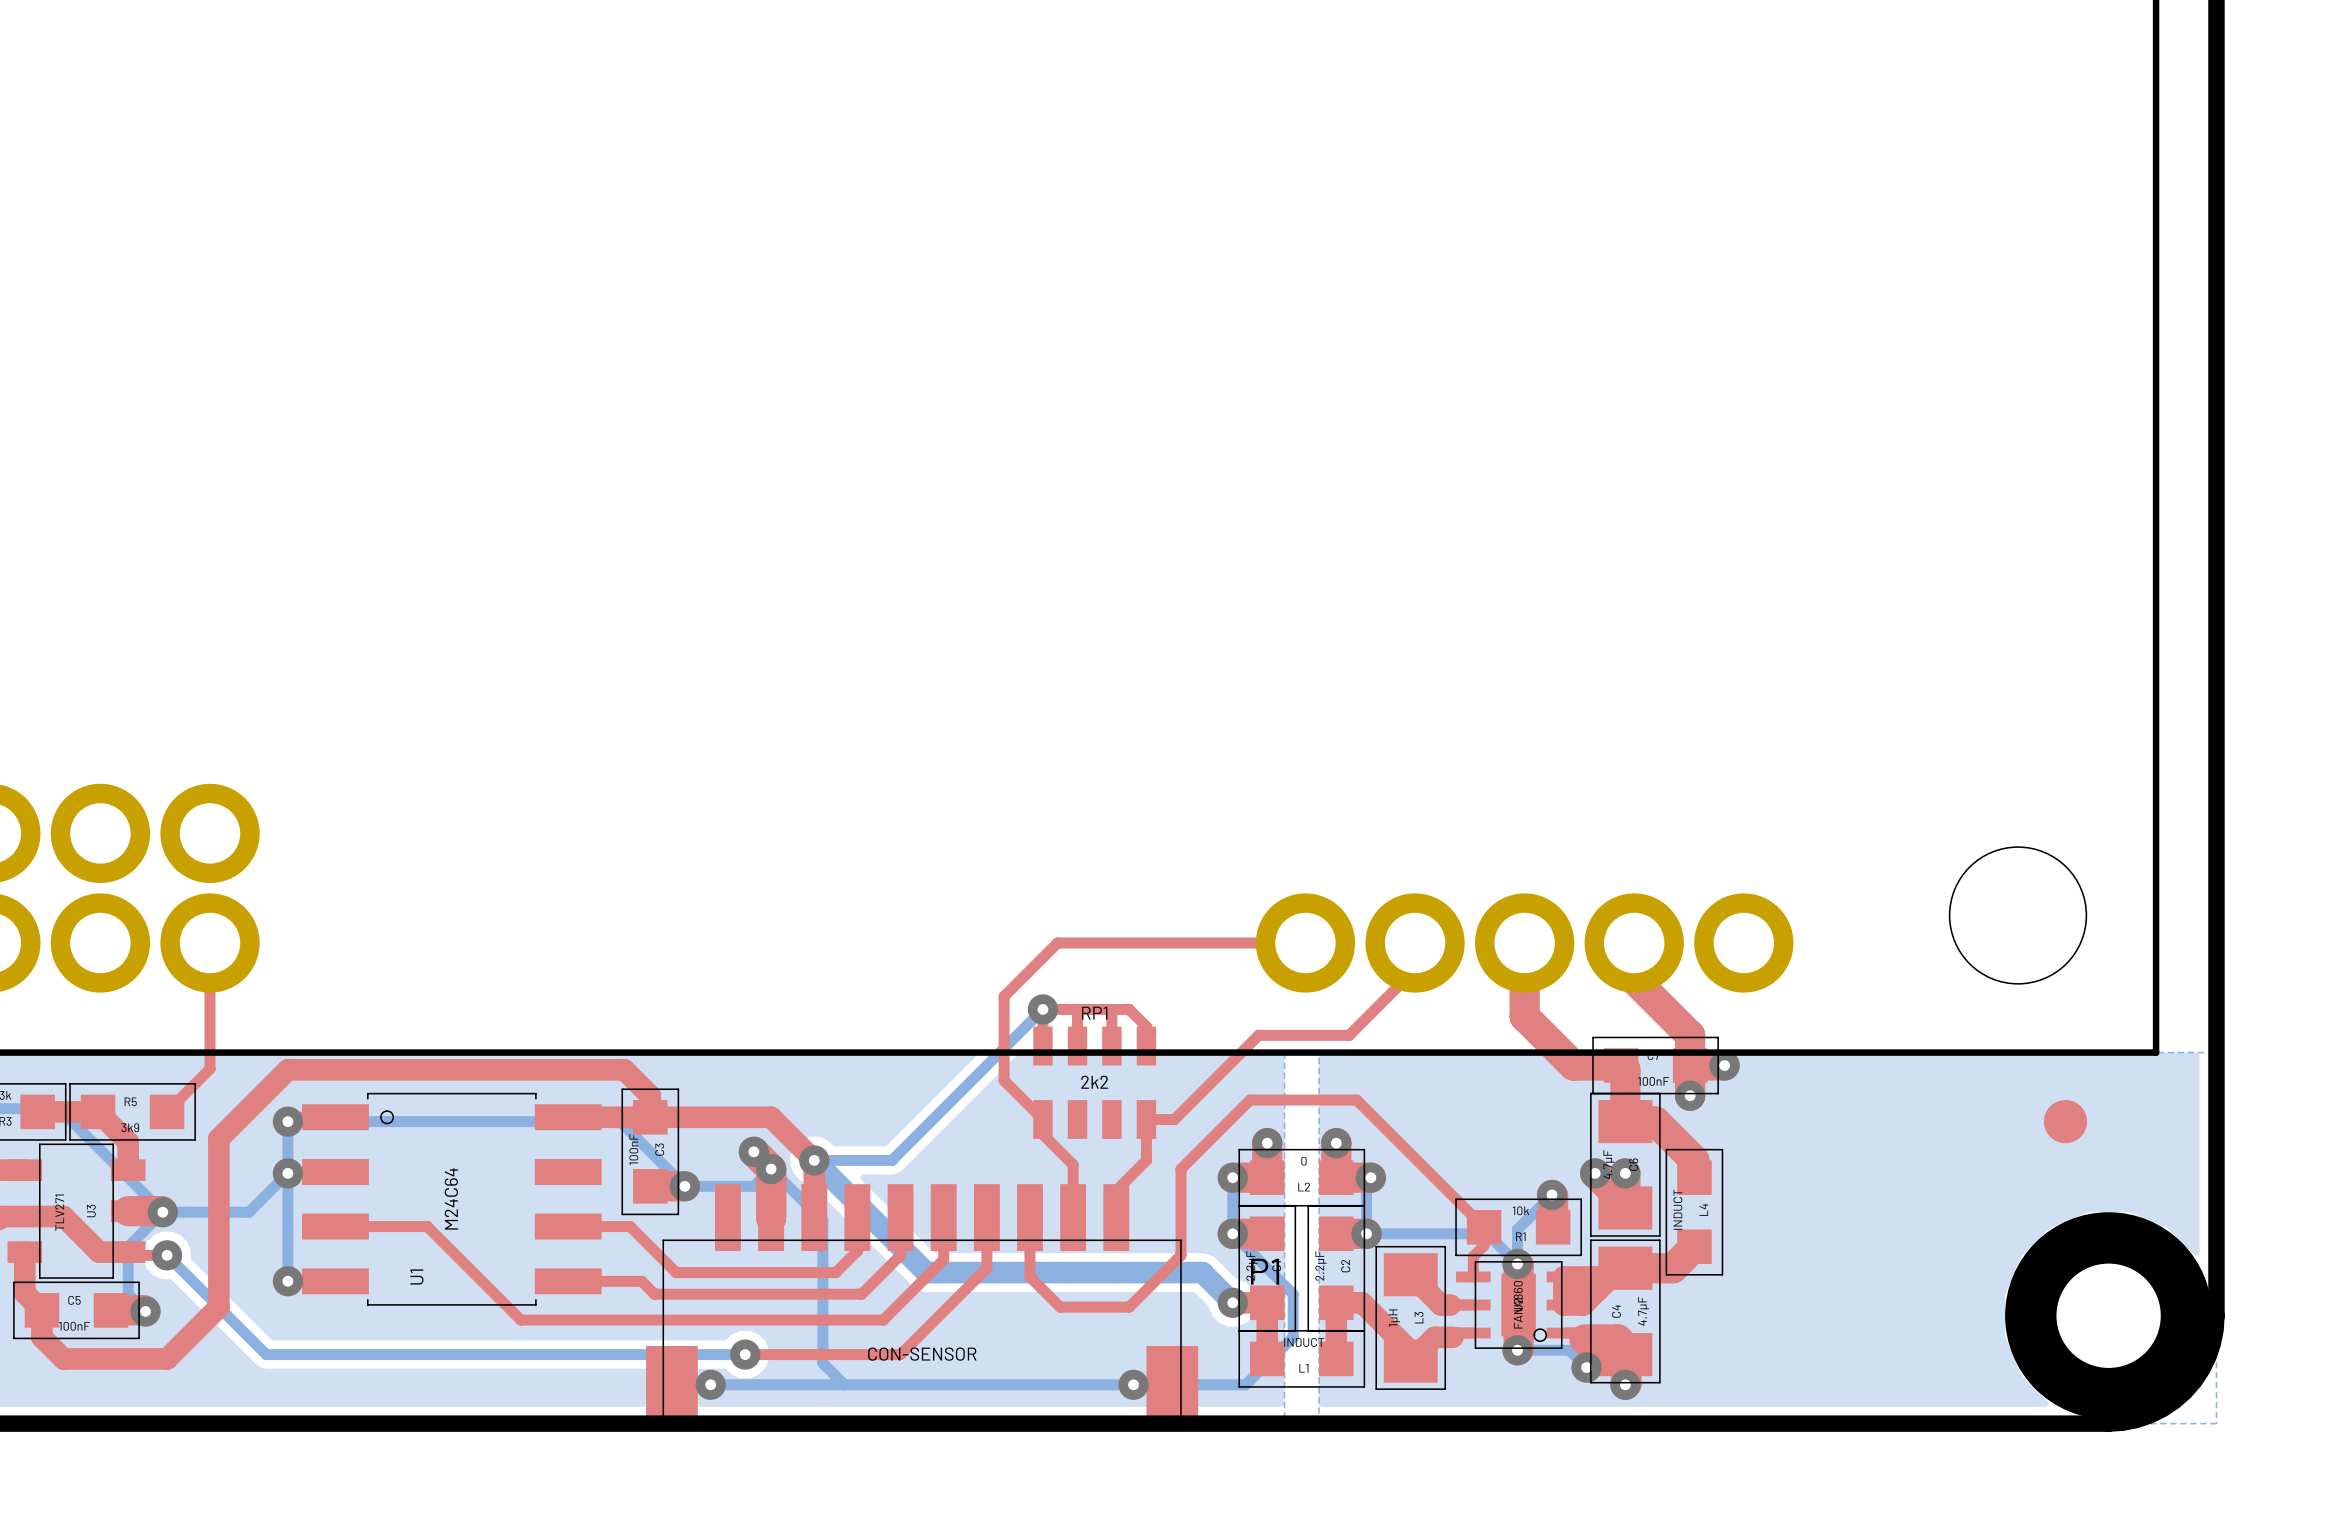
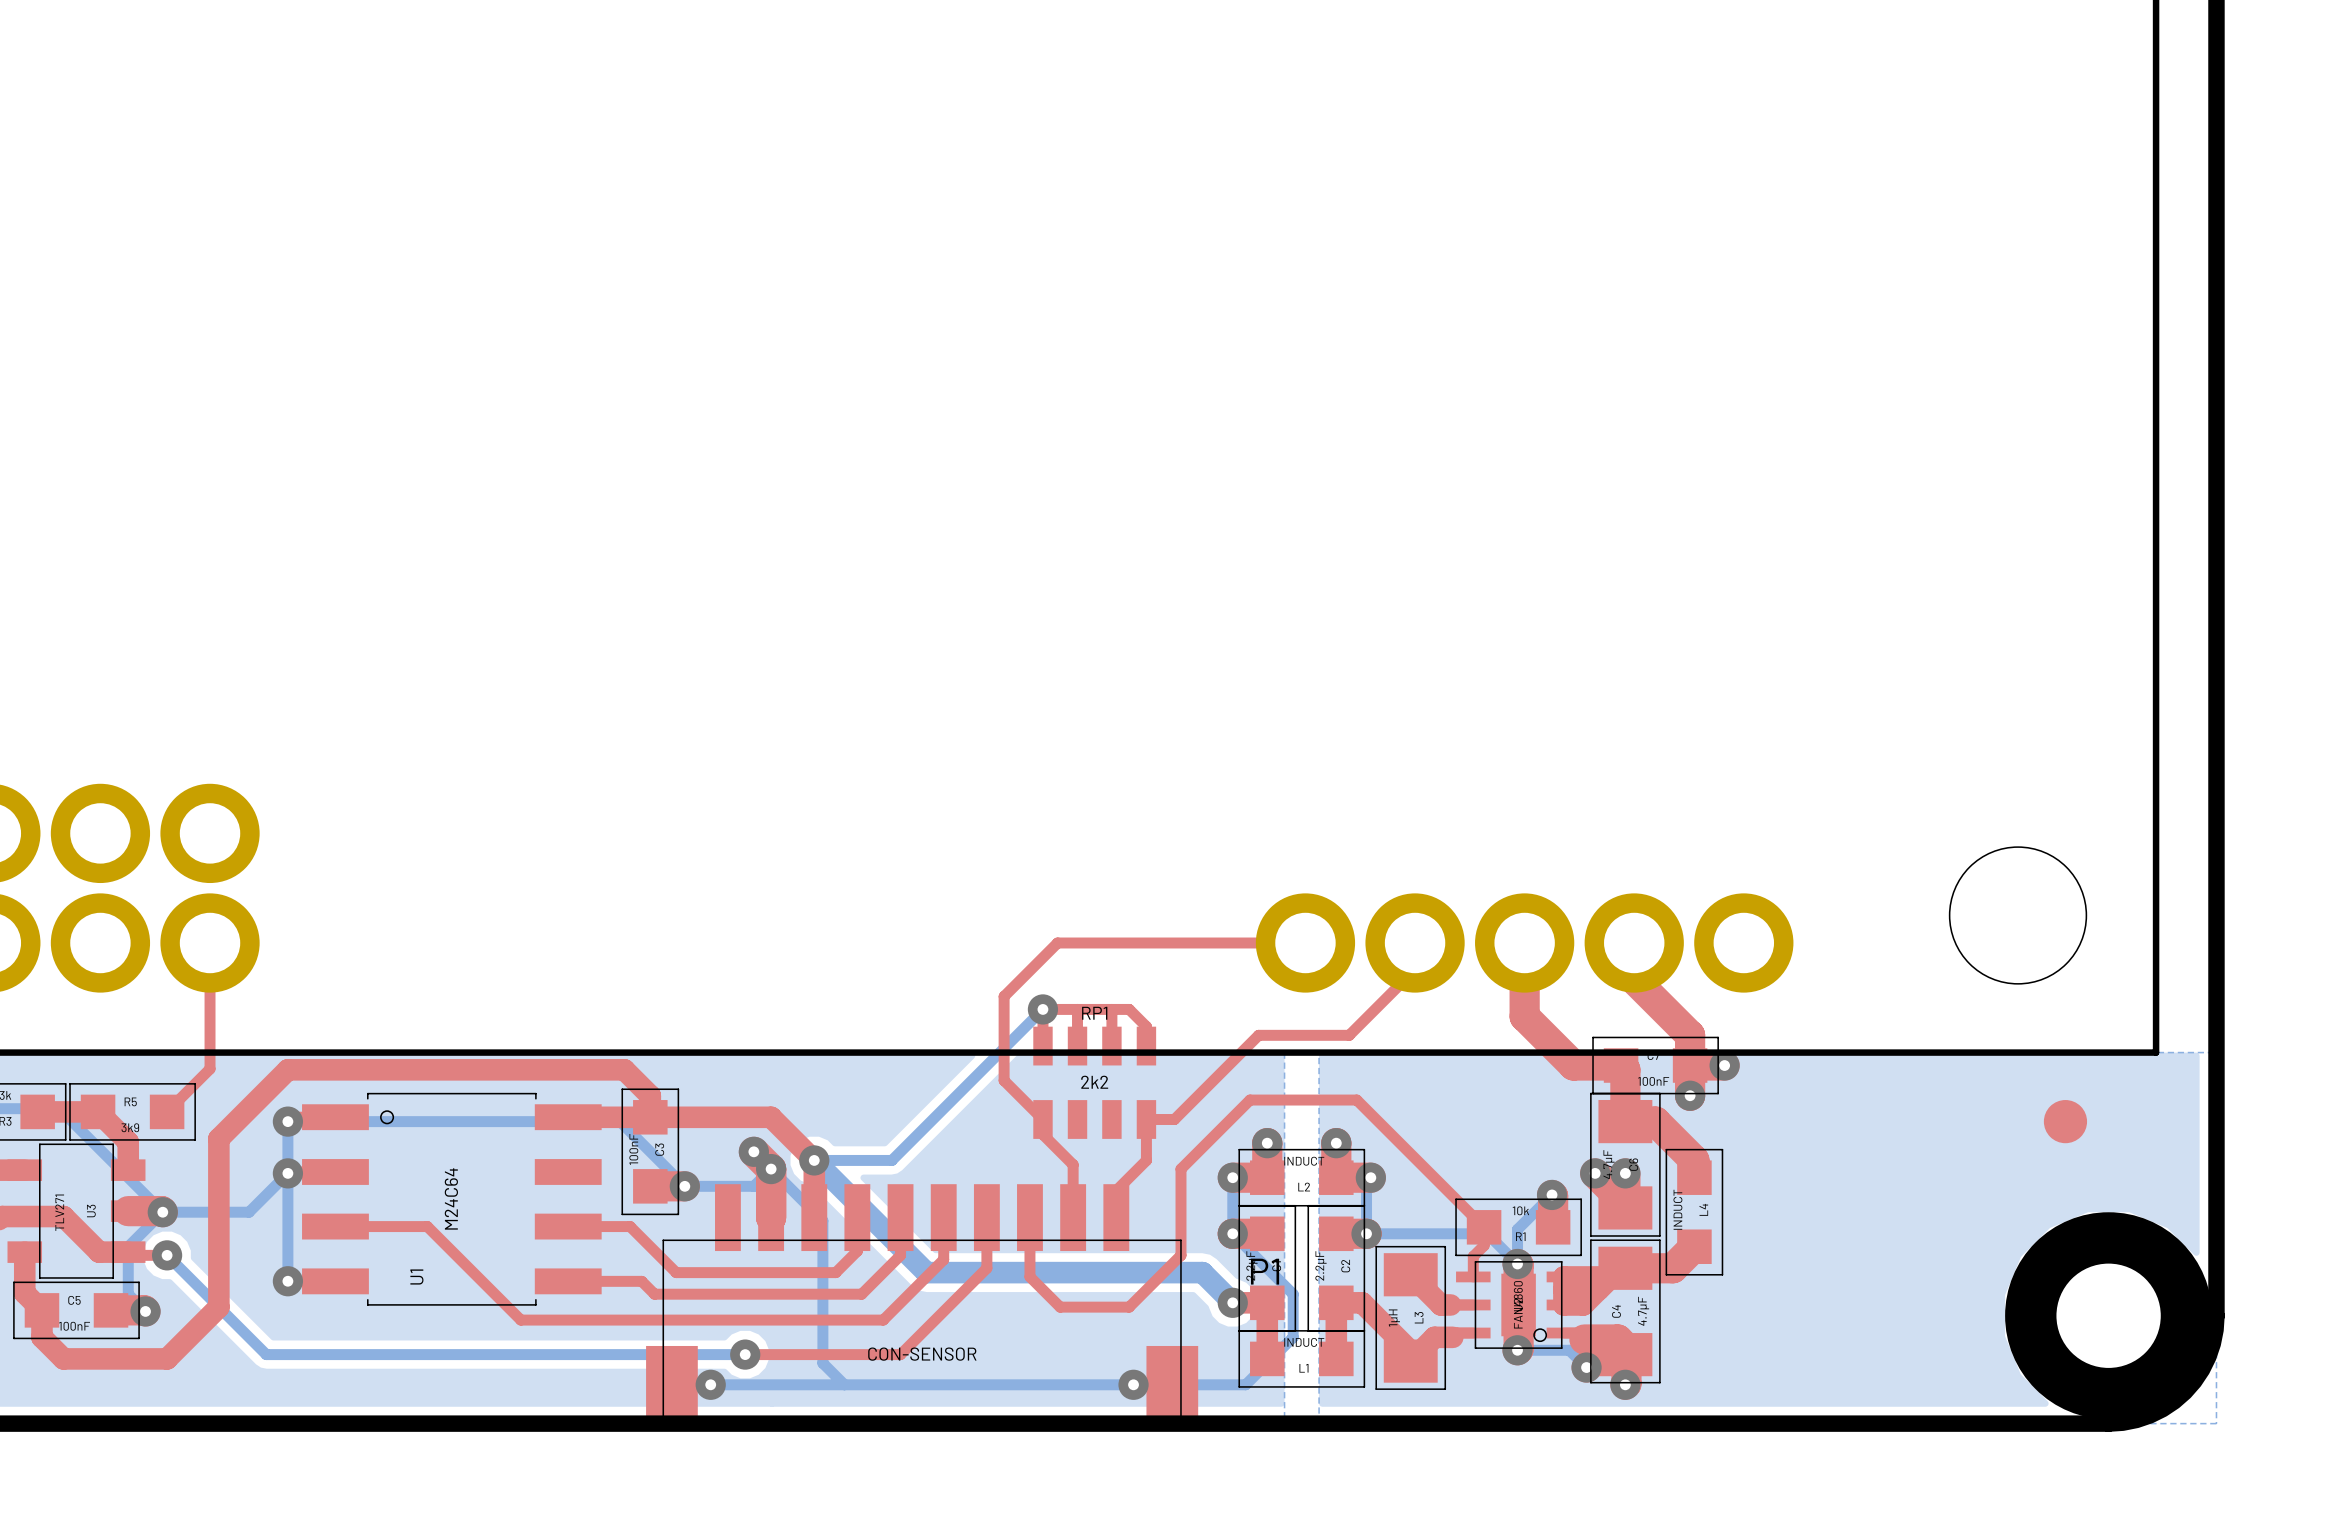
L2 value: 0 (1303, 1161) -> INDUCT (1304, 1161)

